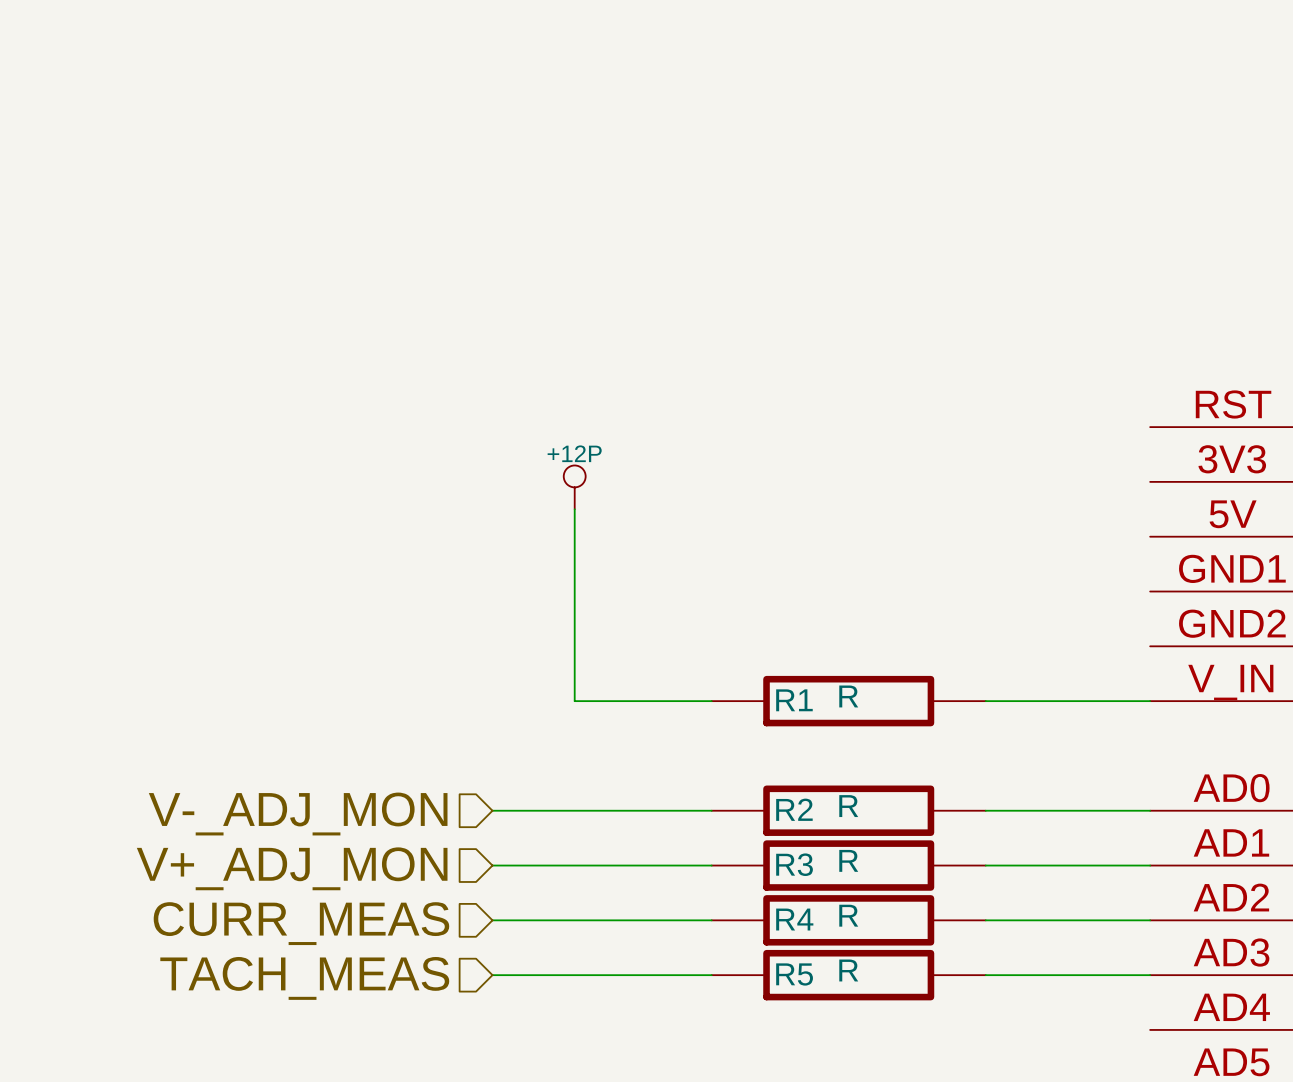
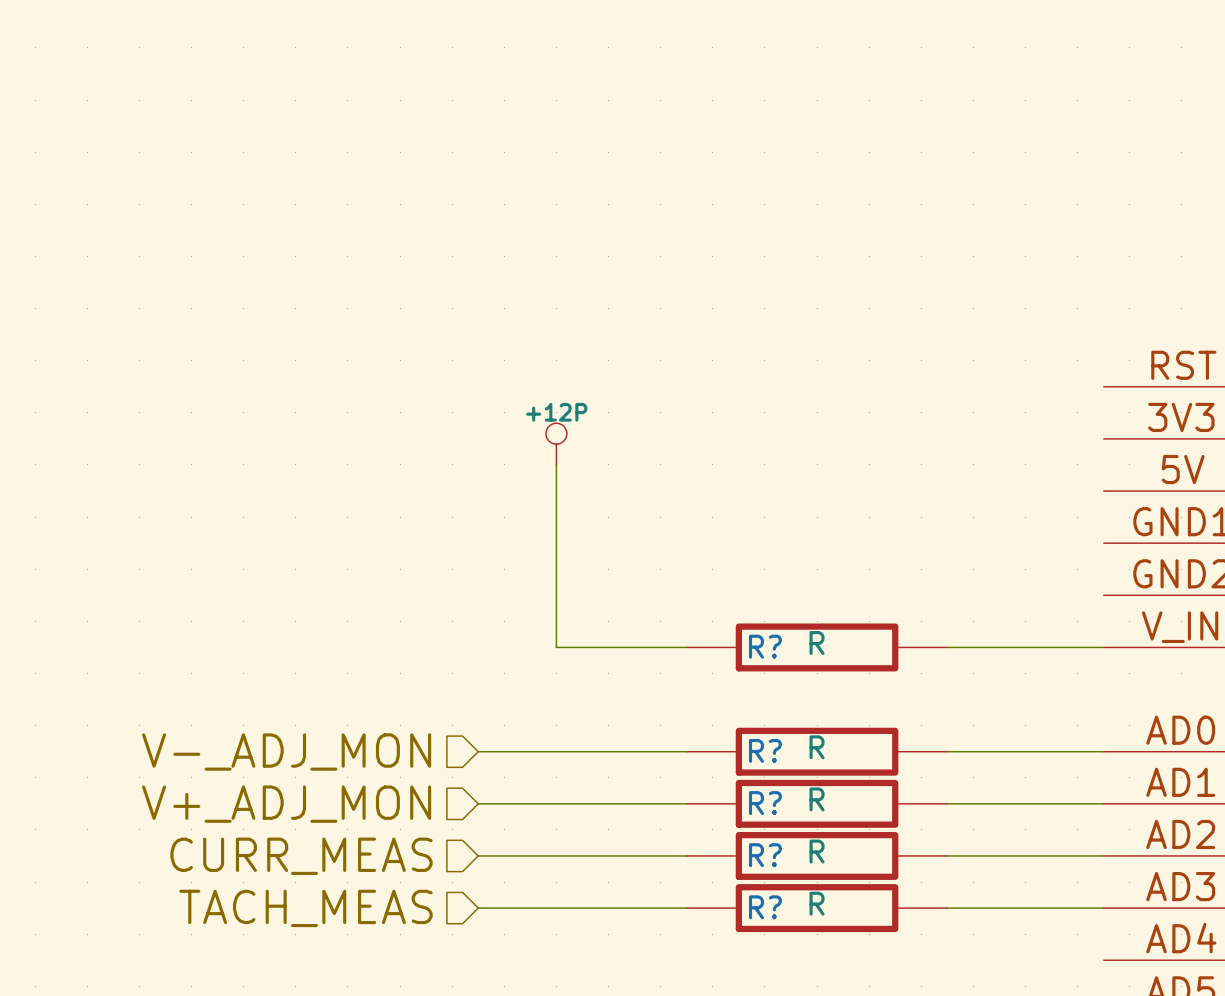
R1 name: R1 (794, 700) -> R? (765, 646)
R2 name: R2 (794, 809) -> R? (765, 750)
R3 name: R3 (794, 864) -> R? (765, 803)
R4 name: R4 (794, 919) -> R? (765, 855)
R5 name: R5 (794, 974) -> R? (765, 907)

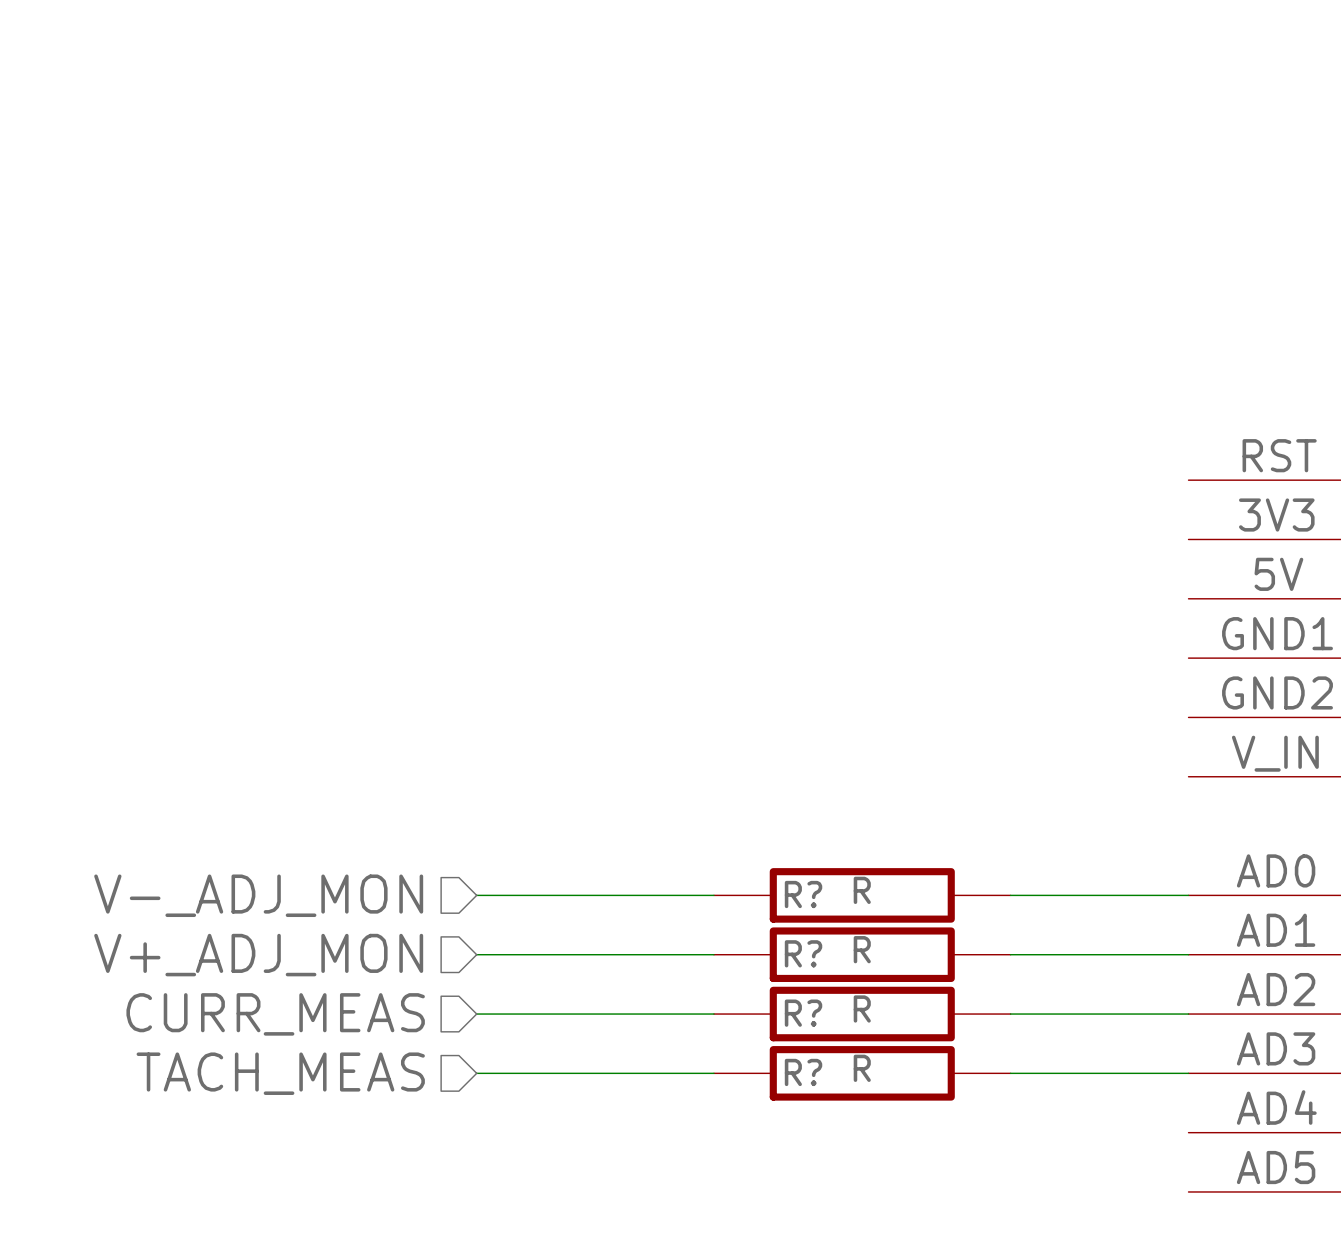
power symbol: +12P (556, 444) -> none
wire: (556, 464) (556, 647) (686, 647) -> none
R?: R (817, 647) -> none
wire: (947, 647) (1103, 647) -> none

